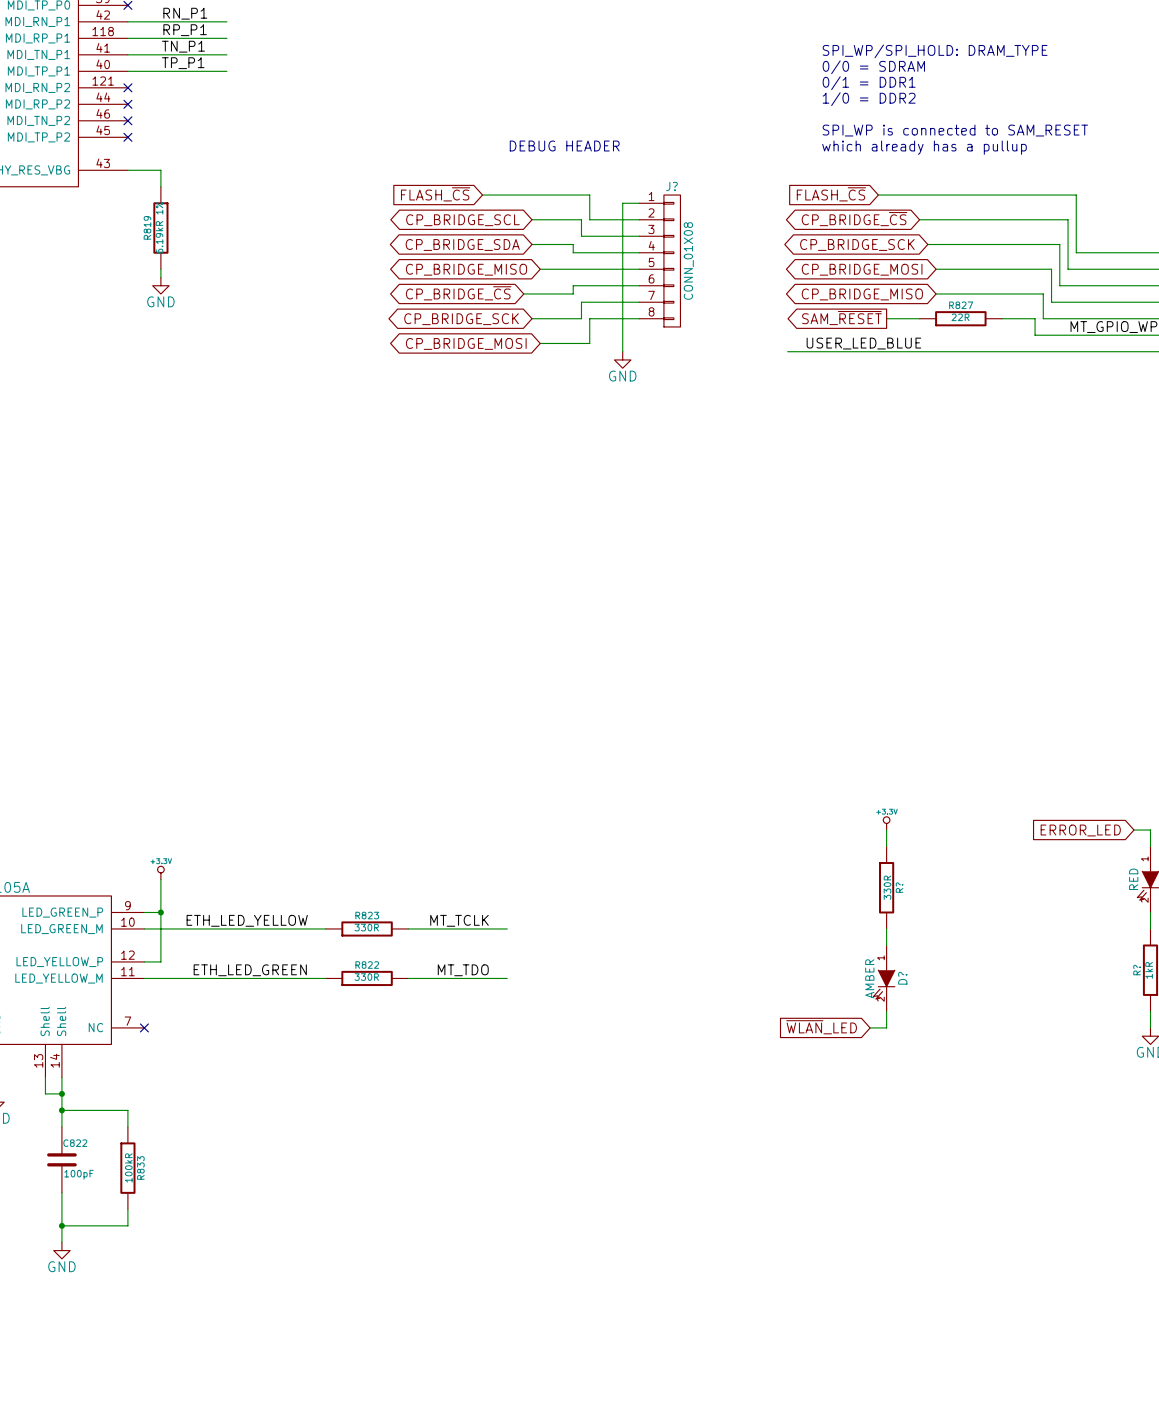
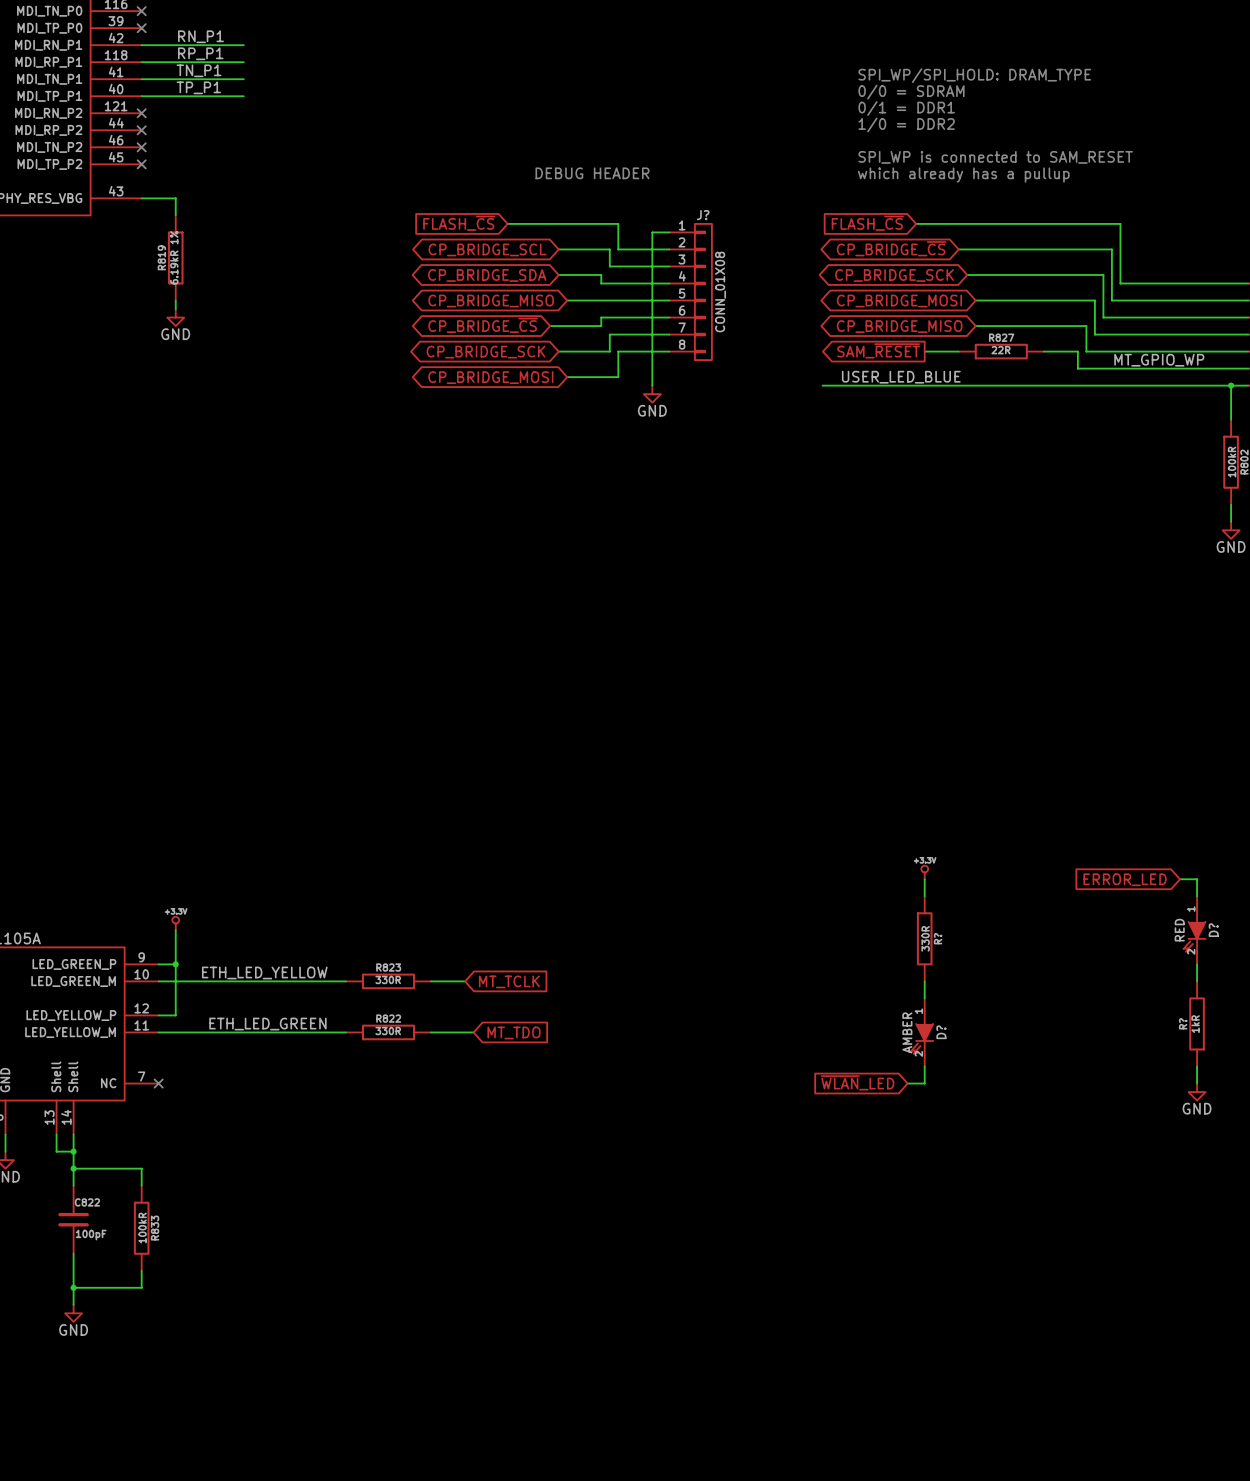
label: MT_TCLK (459, 920) -> none
wire: (441, 928) (507, 928) -> none
global label: none -> MT_TCLK (509, 981)
label: MT_TDO (463, 970) -> none
wire: (449, 978) (507, 978) -> none
global label: none -> MT_TDO (513, 1032)

